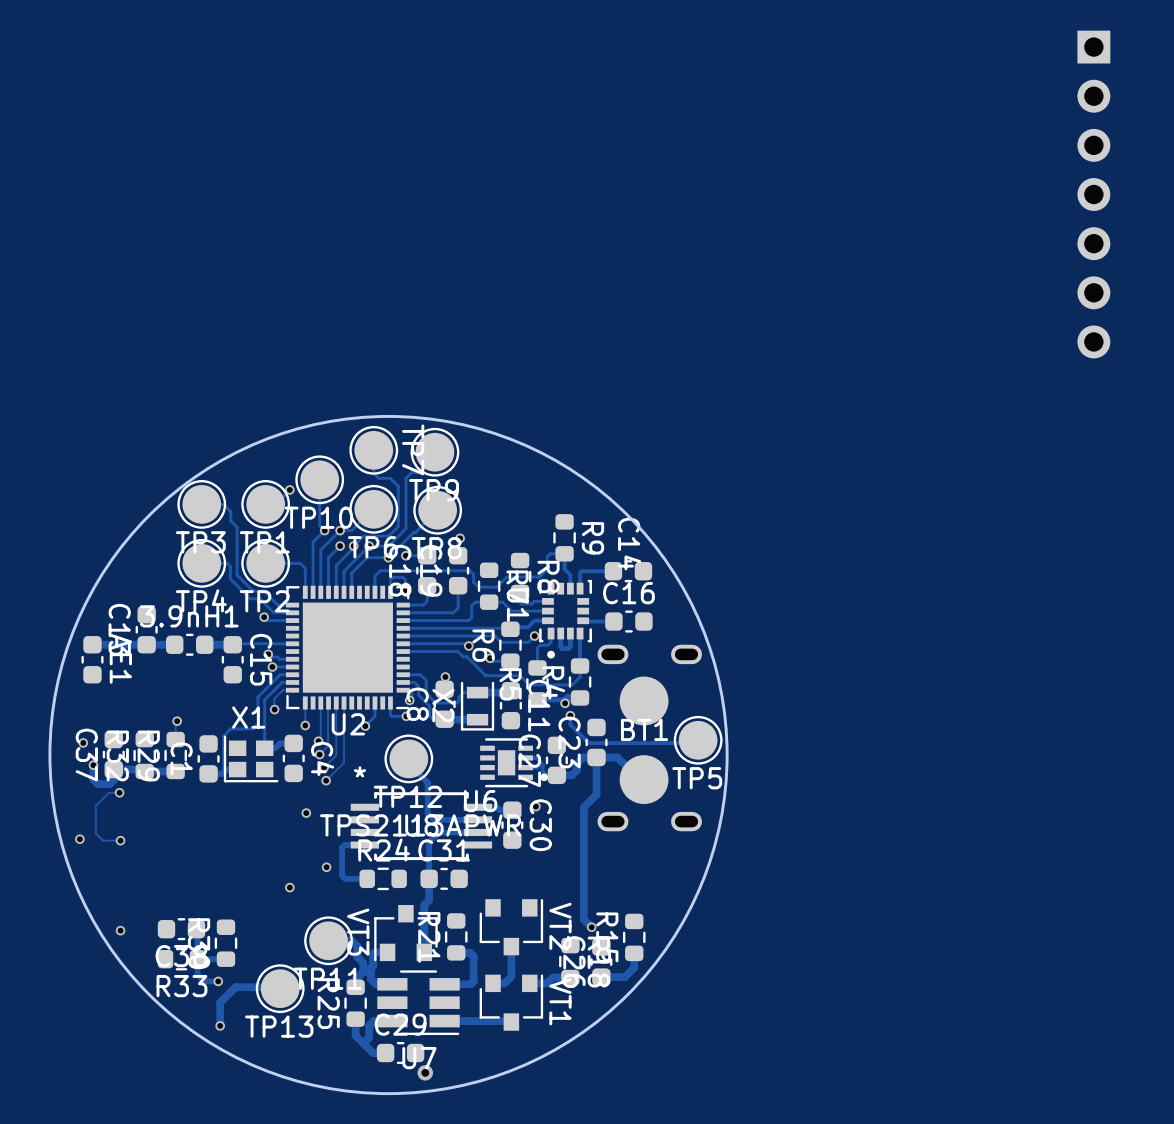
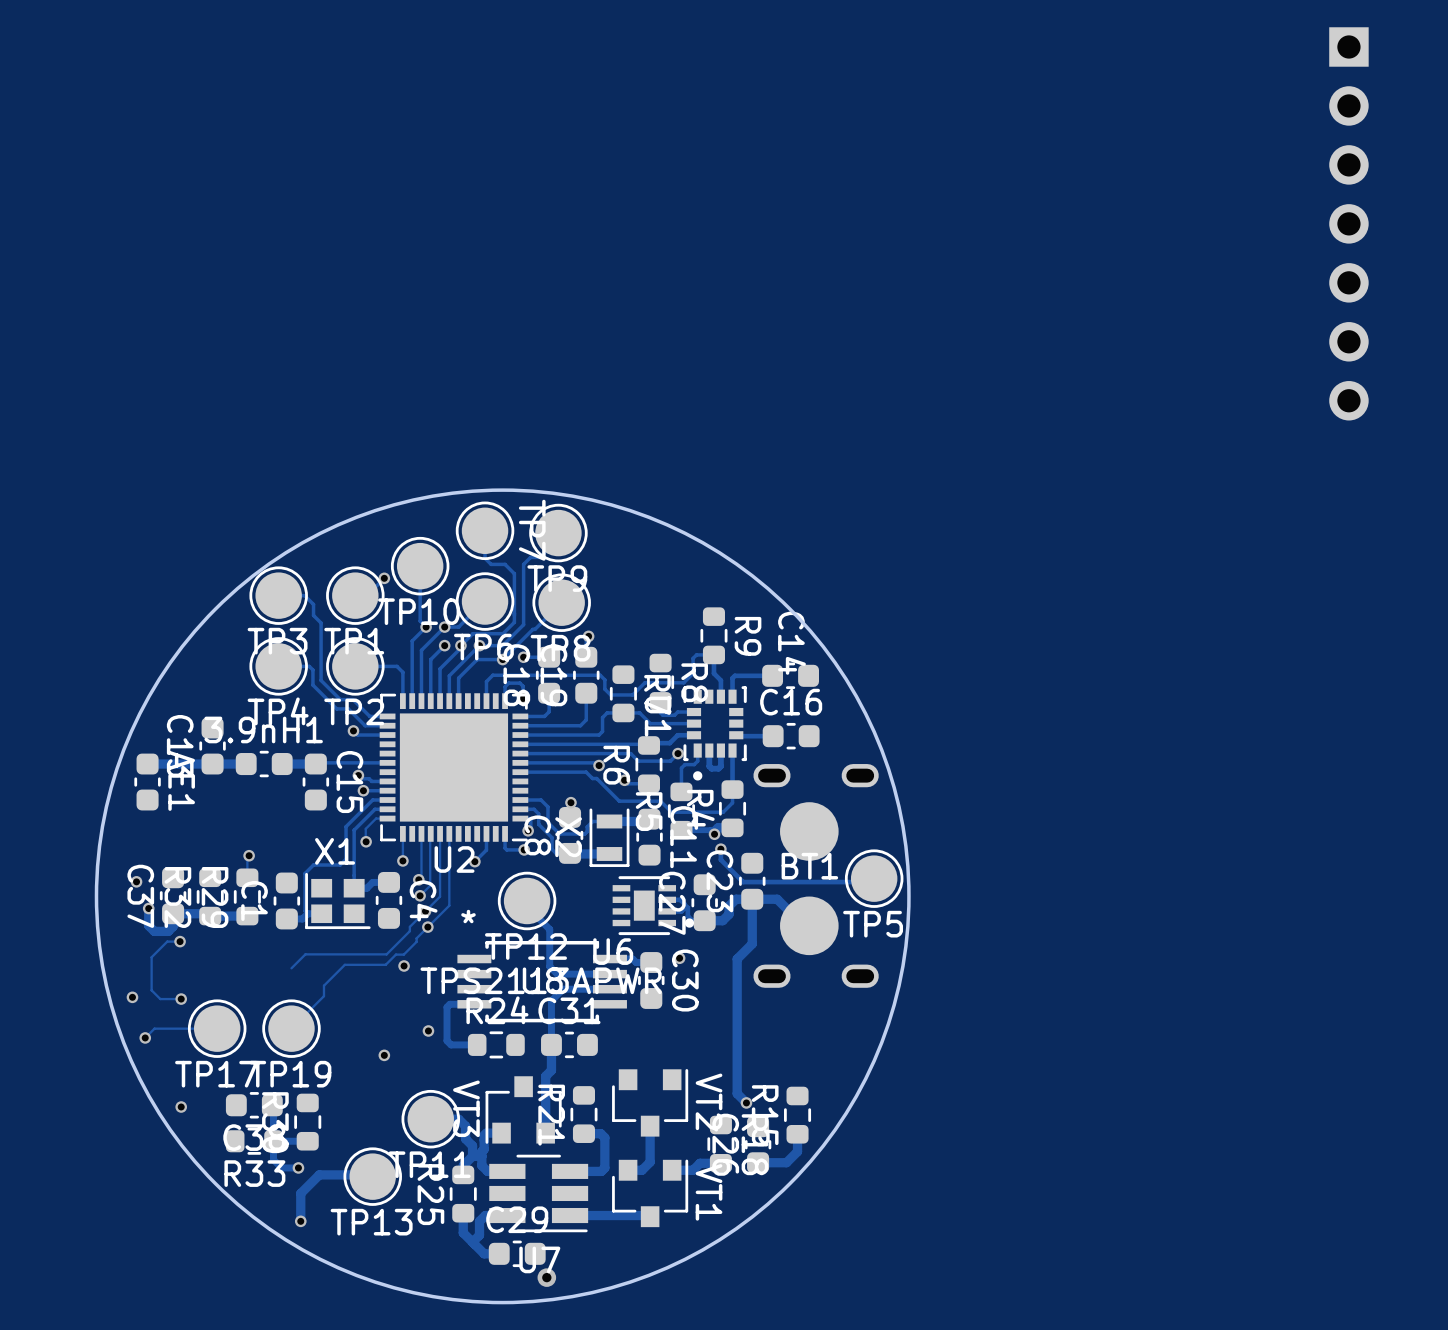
track: none -> (425, 911) (409, 926) (409, 931) (386, 954) (305, 954) (291, 968)
track: none -> (427, 927) (403, 954) (395, 954) (385, 964) (344, 964) (323, 985) (323, 996) (291, 1028)
track: none -> (217, 1028) (154, 1028) (145, 1037)
TP17: none -> (217, 1028)
TP19: none -> (291, 1028)
via: none -> (145, 1037)

